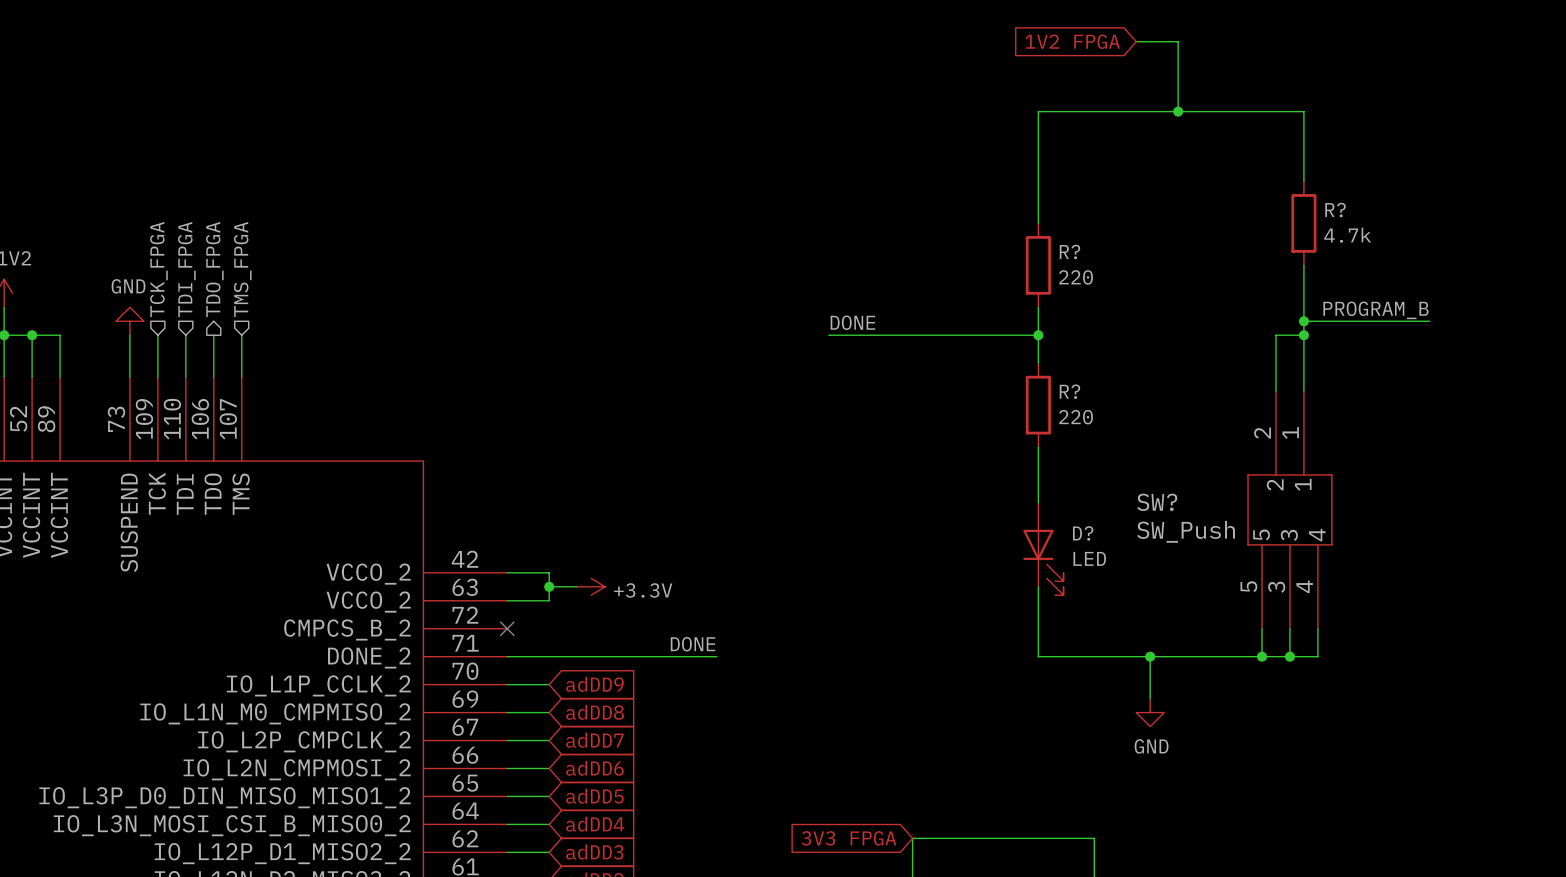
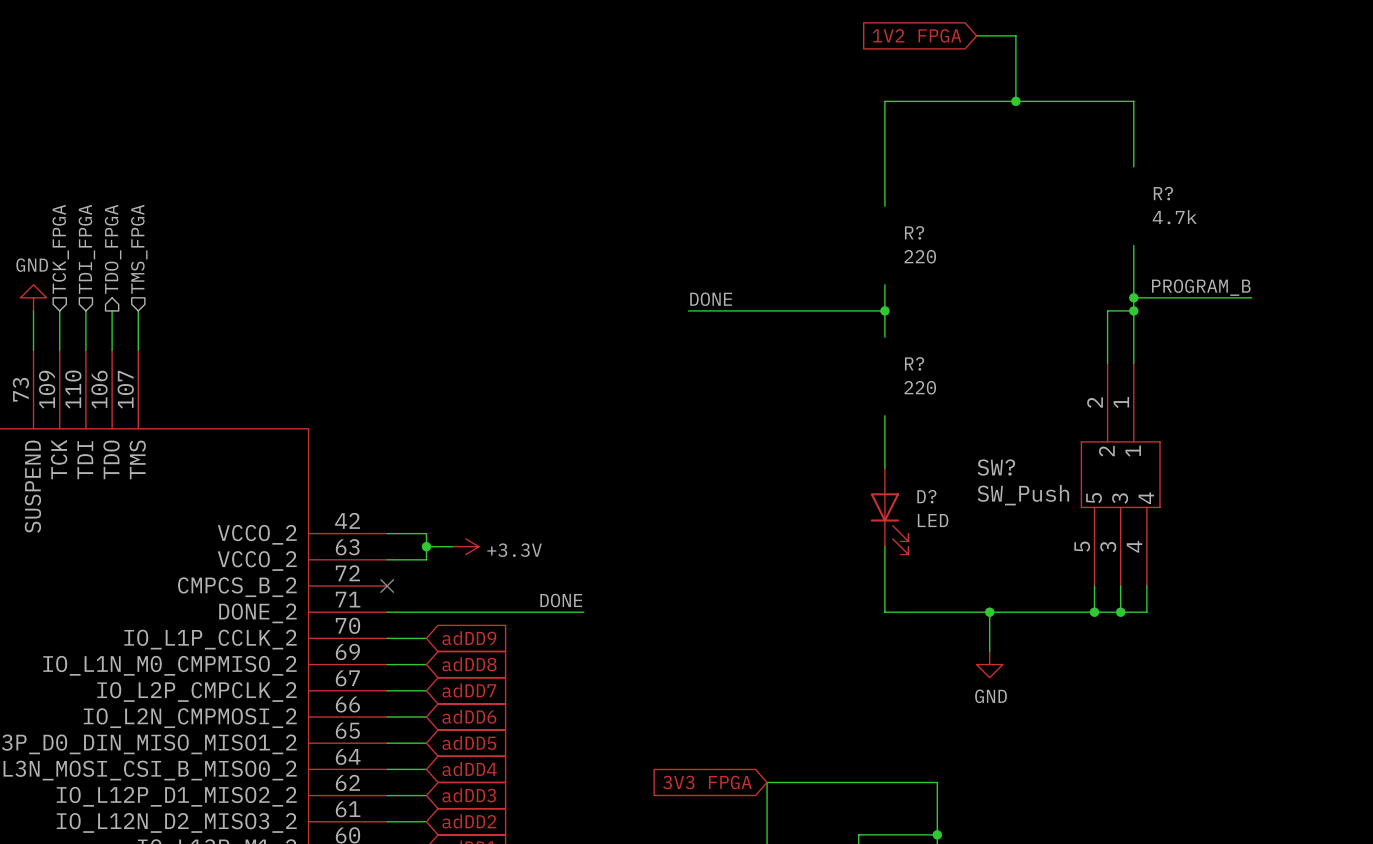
R?: 4.7k (1303, 223) -> none
R?: 220 (1038, 265) -> none
R?: 220 (1038, 405) -> none

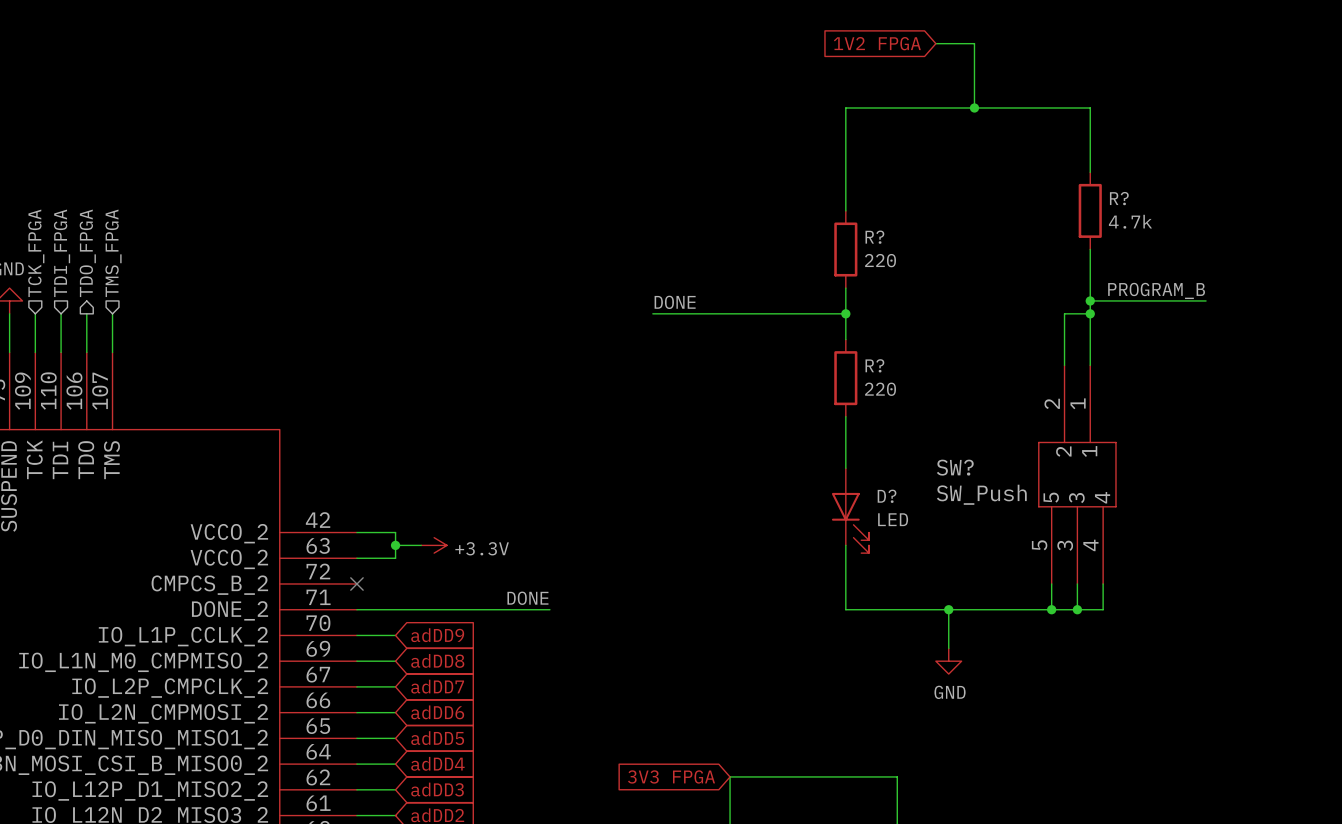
R?: none -> 4.7k (1090, 210)
R?: none -> 220 (845, 249)
R?: none -> 220 (845, 378)

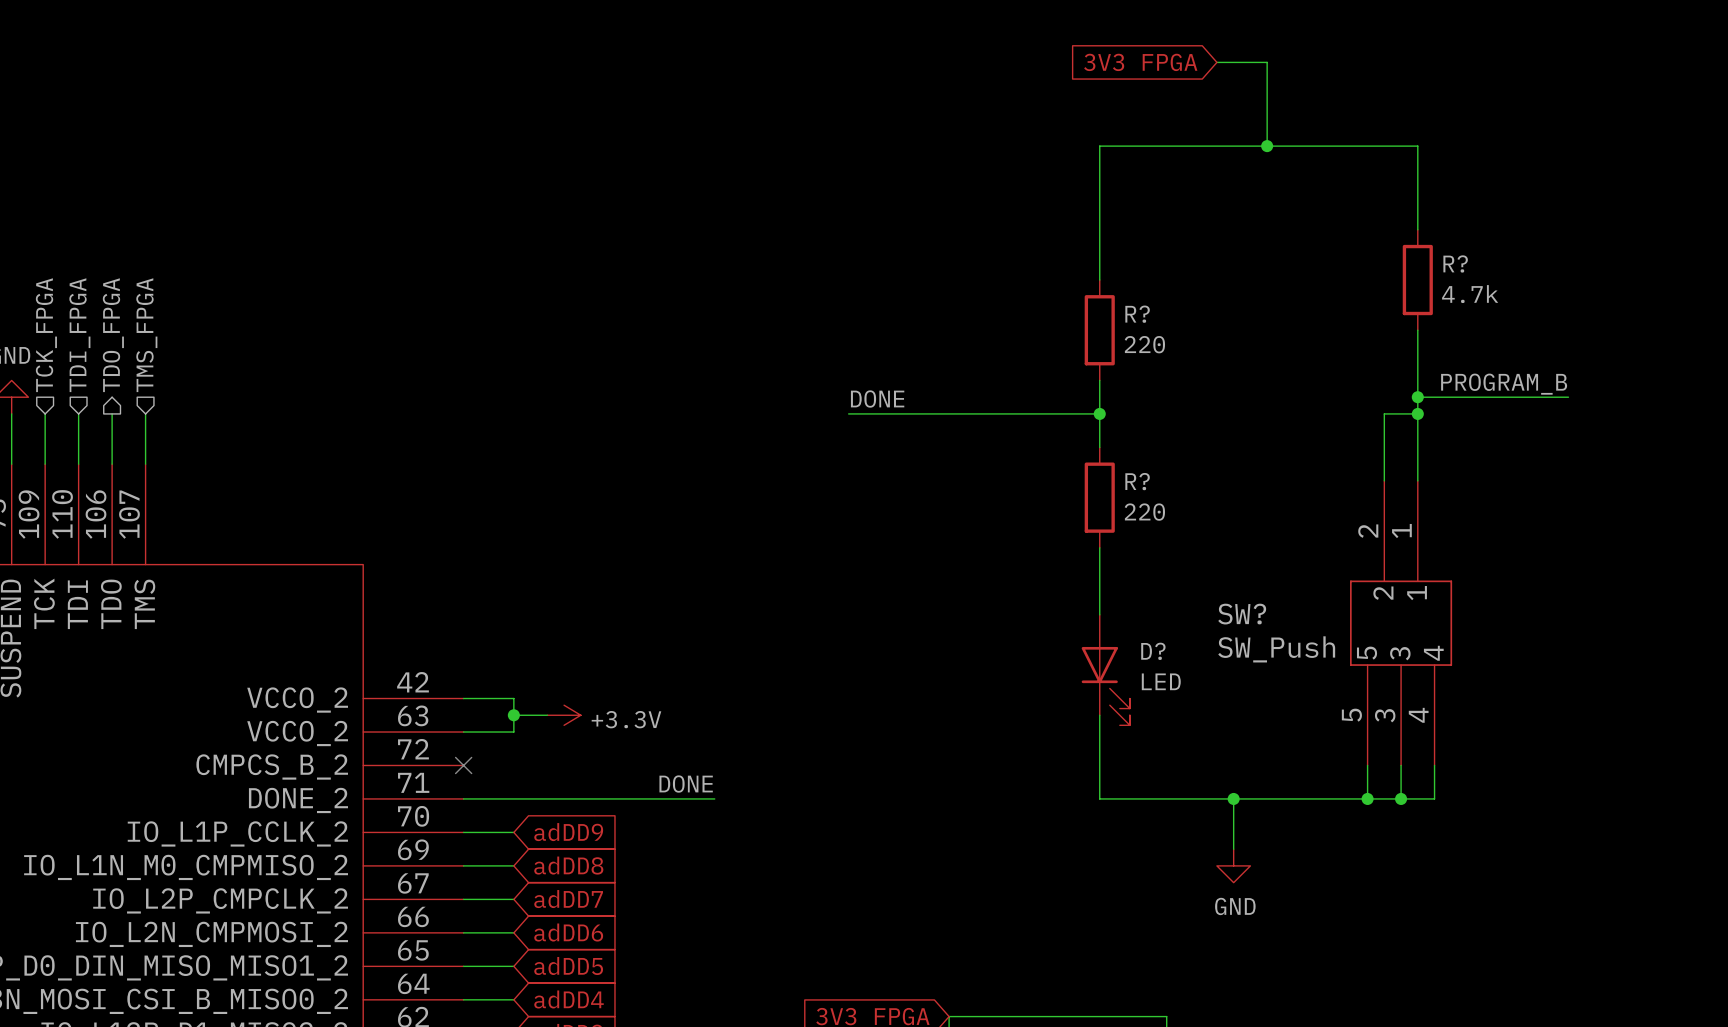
global label: 1V2 FPGA (877, 43) -> 3V3 FPGA (1140, 62)

